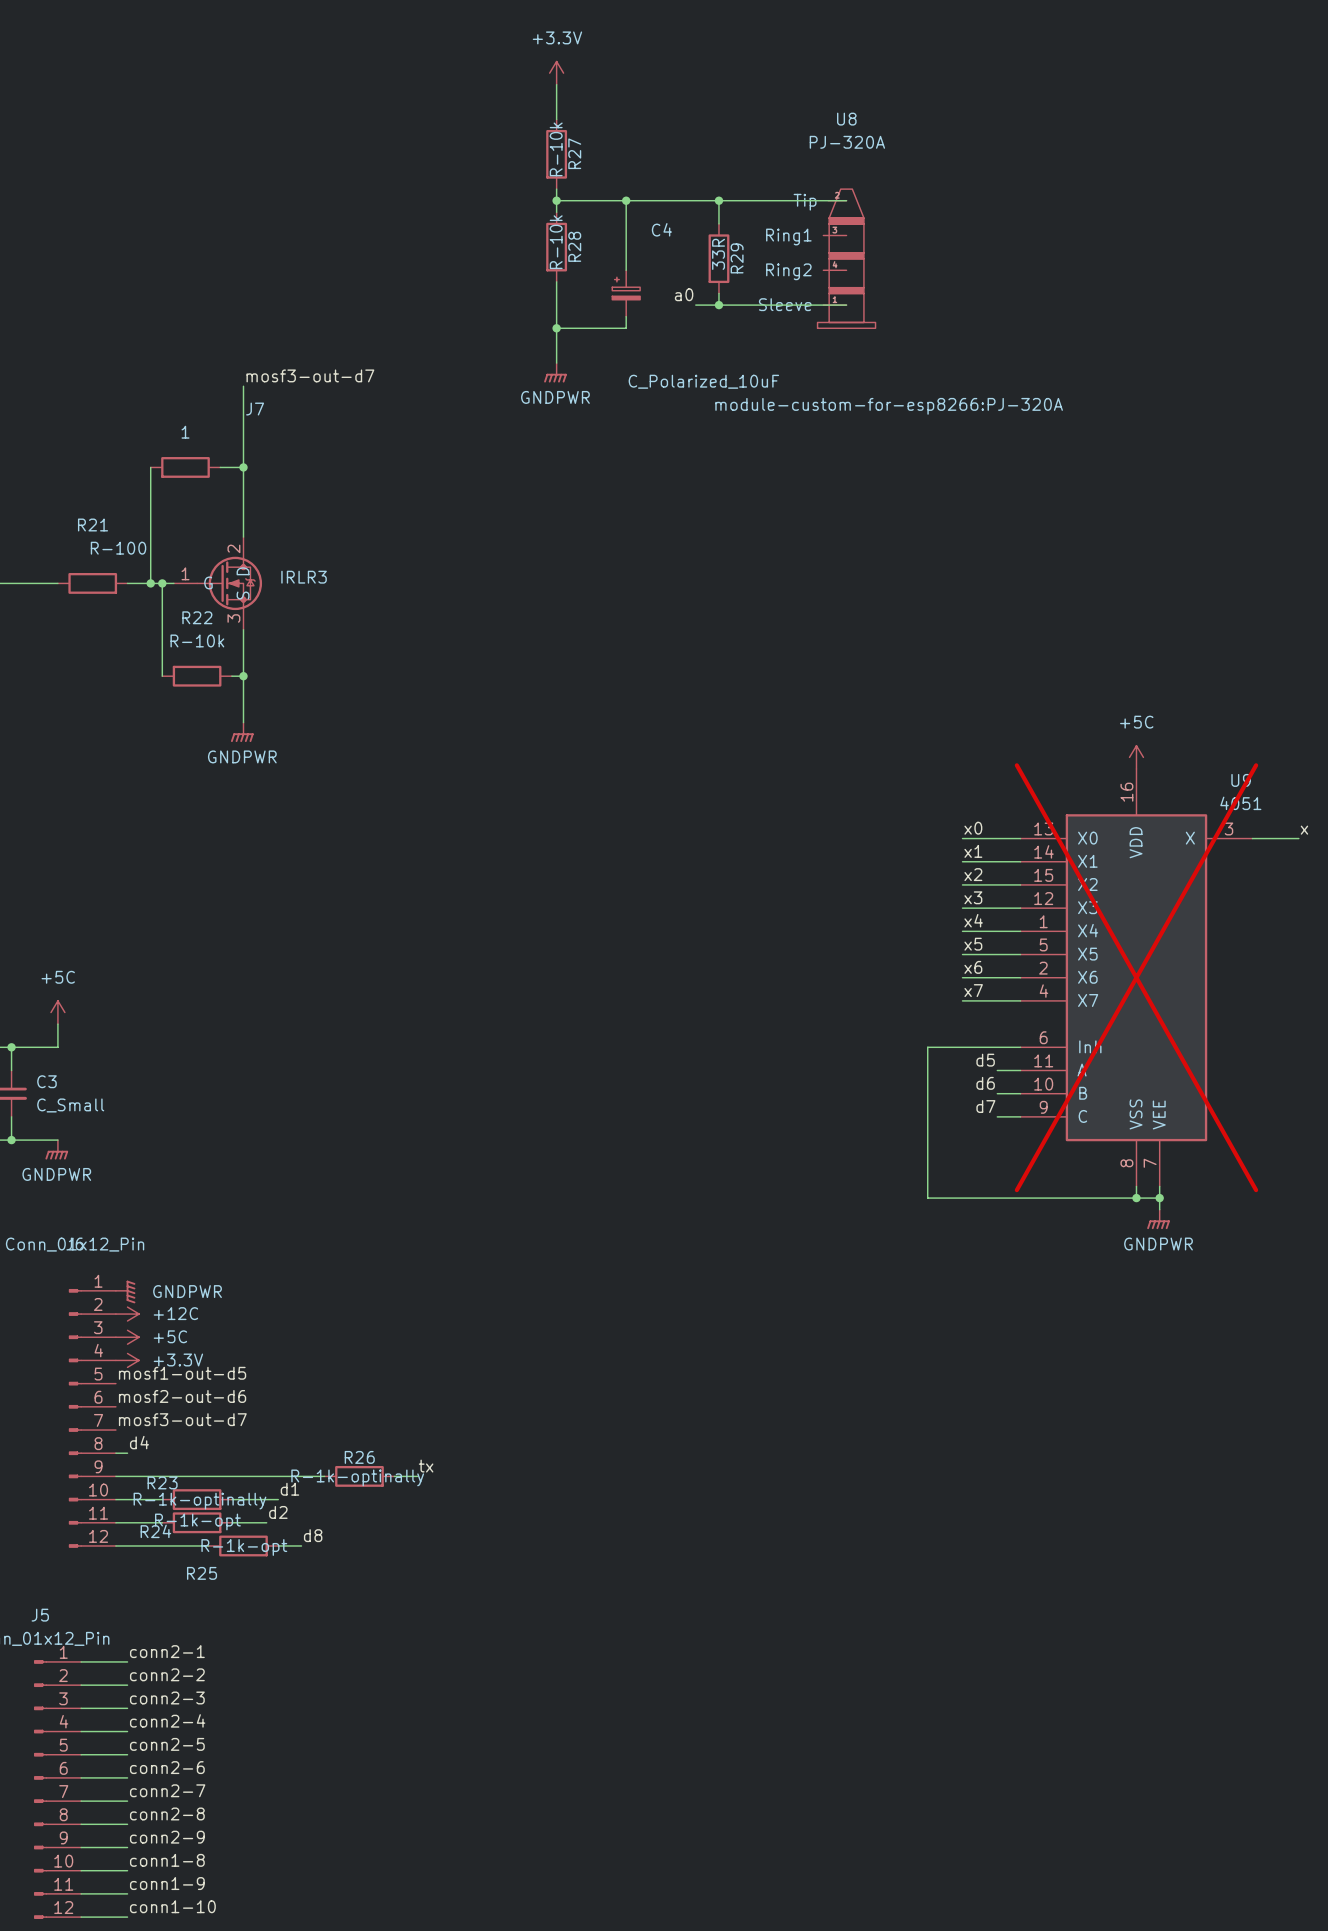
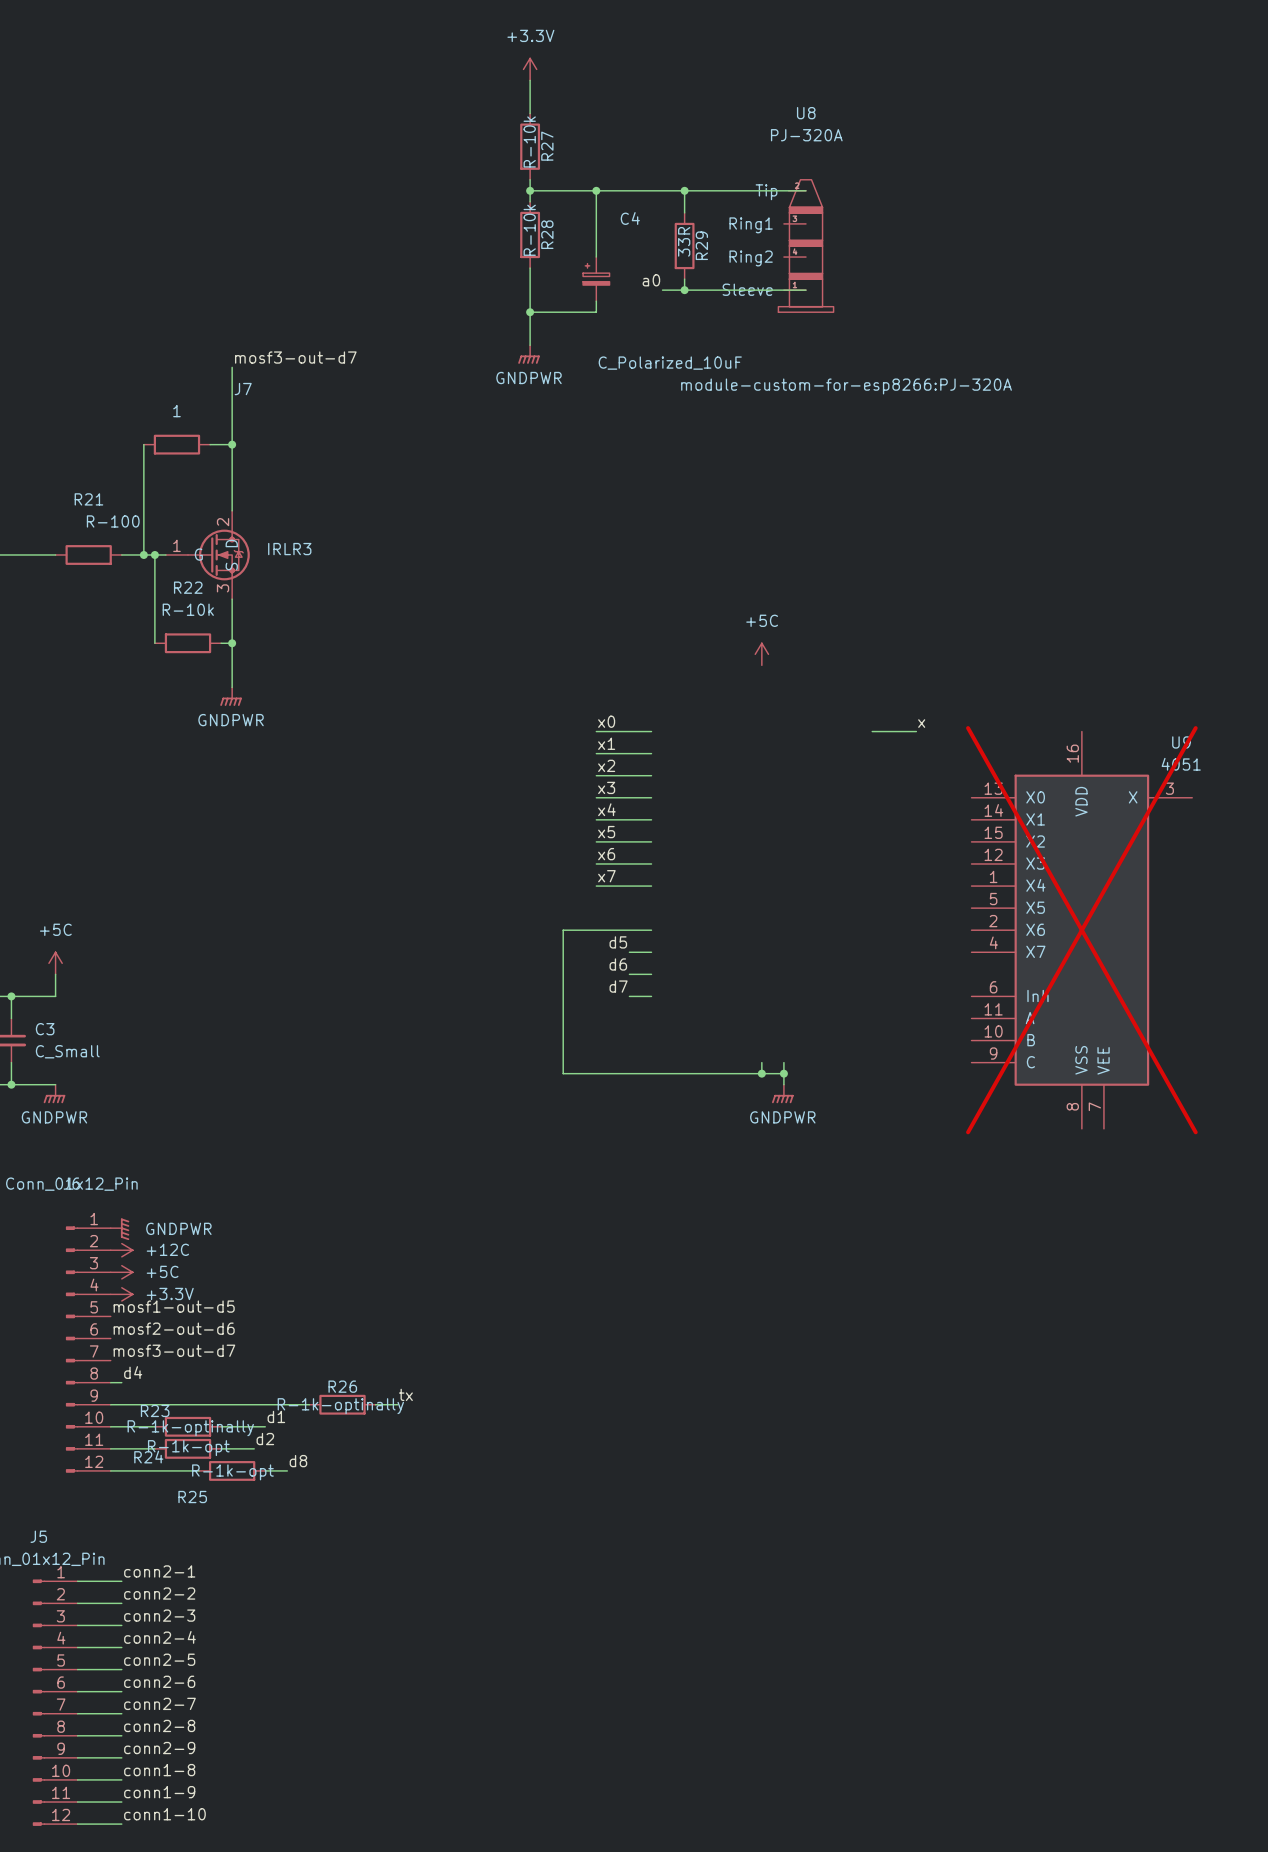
power symbol: none -> +5C (761, 654)
power symbol: +5C (1136, 757) -> none
label: none -> x0 (606, 721)
label: none -> x (921, 723)
wire: none -> (596, 731) (651, 731)
wire: none -> (872, 731) (916, 731)
label: none -> x1 (606, 743)
wire: none -> (596, 753) (651, 753)
label: none -> x2 (606, 765)
wire: none -> (596, 775) (651, 775)
label: none -> x3 (606, 787)
label: x0 (973, 828) -> none
label: x (1304, 830) -> none
wire: none -> (596, 797) (651, 797)
wire: (962, 838) (1020, 838) -> none
wire: (1252, 838) (1298, 838) -> none
label: none -> x4 (606, 809)
label: x1 (973, 851) -> none
wire: none -> (596, 819) (651, 819)
wire: (962, 861) (1020, 861) -> none
label: none -> x5 (606, 832)
label: x2 (973, 874) -> none
wire: none -> (596, 841) (651, 841)
wire: (962, 884) (1020, 884) -> none
label: none -> x6 (606, 854)
label: x3 (973, 897) -> none
wire: none -> (596, 863) (651, 863)
wire: (962, 908) (1020, 908) -> none
label: none -> x7 (606, 876)
label: x4 (973, 920) -> none
wire: none -> (596, 886) (651, 886)
wire: (962, 931) (1020, 931) -> none
label: x5 (973, 944) -> none
wire: (962, 954) (1020, 954) -> none
label: x6 (973, 967) -> none
wire: none -> (651, 930) (563, 930) (563, 1073) (783, 1073)
wire: (962, 977) (1020, 977) -> none
label: none -> d5 (618, 942)
label: x7 (973, 990) -> none
wire: none -> (629, 952) (651, 952)
wire: (962, 1000) (1020, 1000) -> none
label: none -> d6 (618, 964)
wire: none -> (629, 974) (651, 974)
label: none -> d7 (618, 986)
wire: none -> (629, 996) (651, 996)
wire: (1020, 1047) (927, 1047) (927, 1198) (1159, 1198) -> none
label: d5 (985, 1060) -> none
wire: (997, 1070) (1020, 1070) -> none
label: d6 (985, 1083) -> none
wire: (997, 1093) (1020, 1093) -> none
label: d7 (985, 1106) -> none
wire: none -> (761, 1062) (761, 1073)
wire: none -> (783, 1062) (783, 1084)
wire: (997, 1116) (1020, 1116) -> none
junction: none -> (761, 1073)
junction: none -> (783, 1073)
power symbol: none -> GNDPWR (782, 1093)
wire: (1136, 1186) (1136, 1198) -> none
wire: (1159, 1186) (1159, 1209) -> none
junction: (1136, 1198) -> none
junction: (1159, 1198) -> none
power symbol: GNDPWR (1158, 1219) -> none

